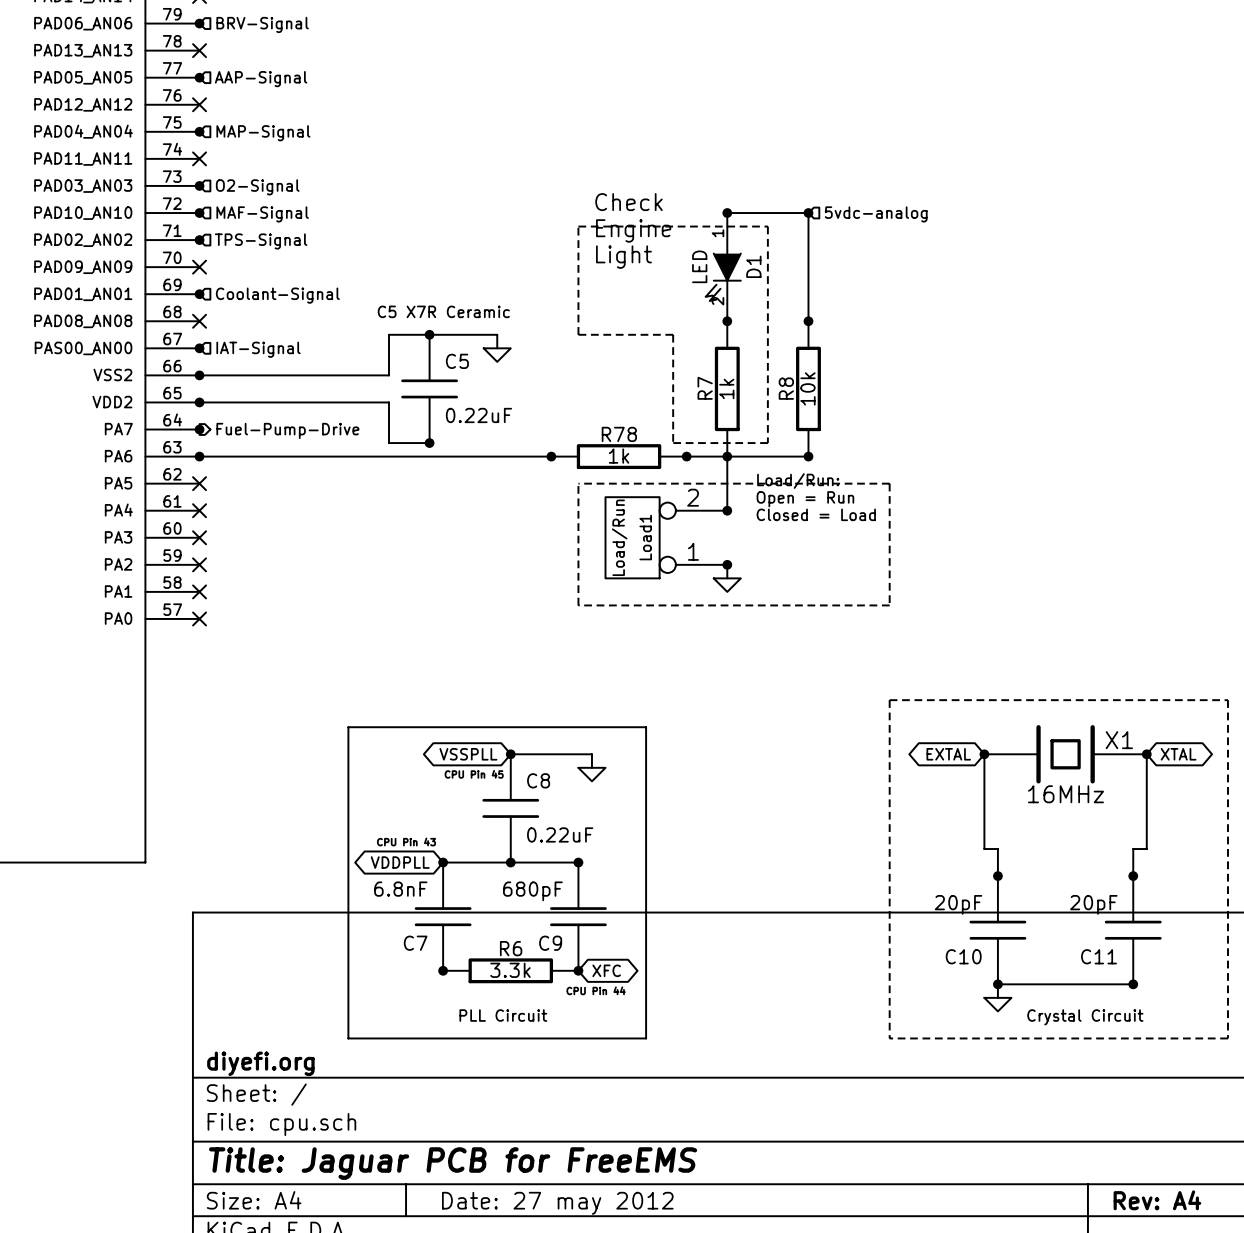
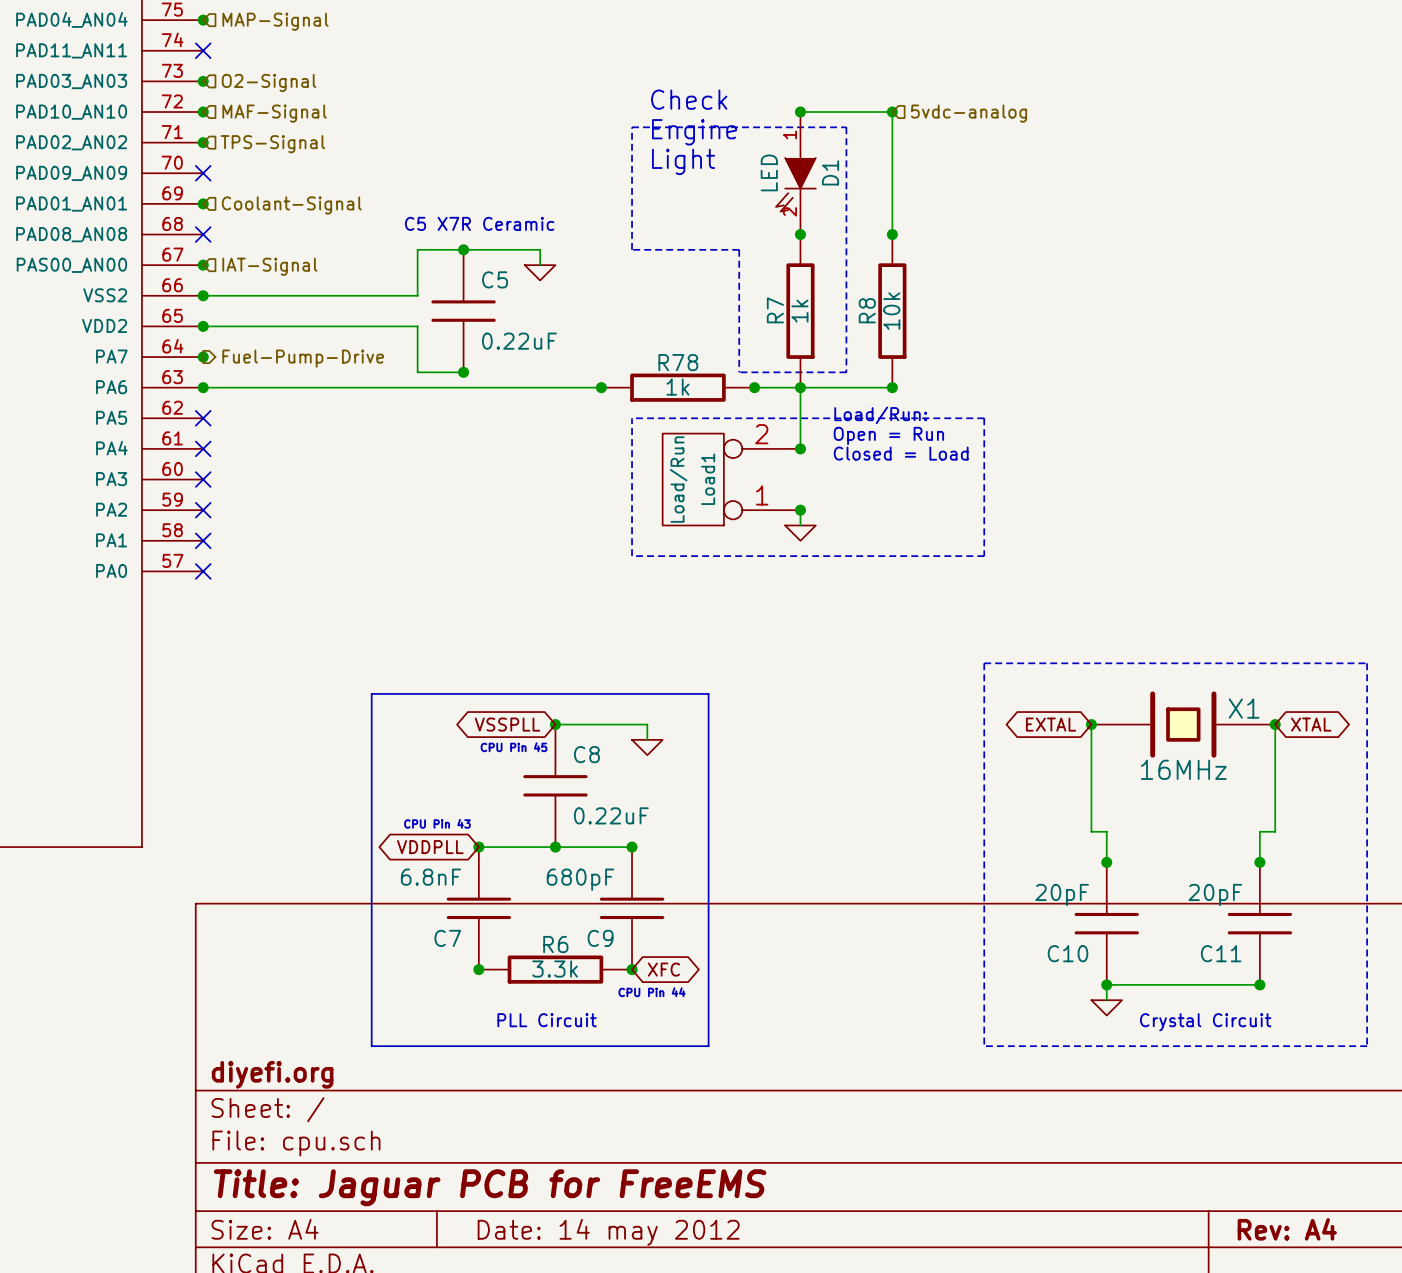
title block: Date: 27 may 2012 (557, 1203) -> Date: 14 may 2012 (608, 1232)

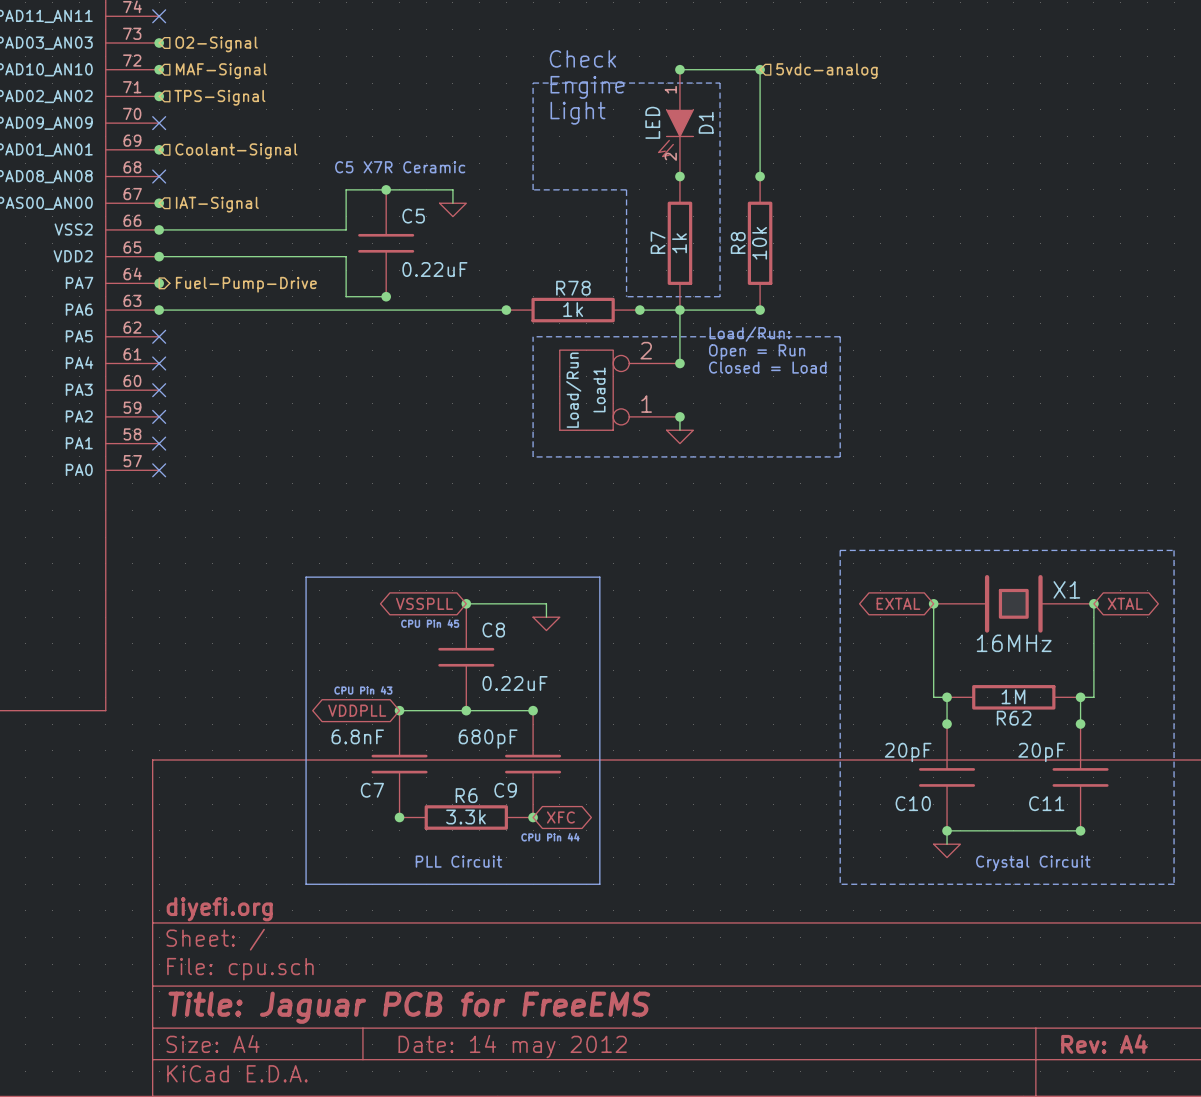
junction: none -> (947, 697)
R62: none -> 1M (1013, 697)
junction: none -> (1080, 697)

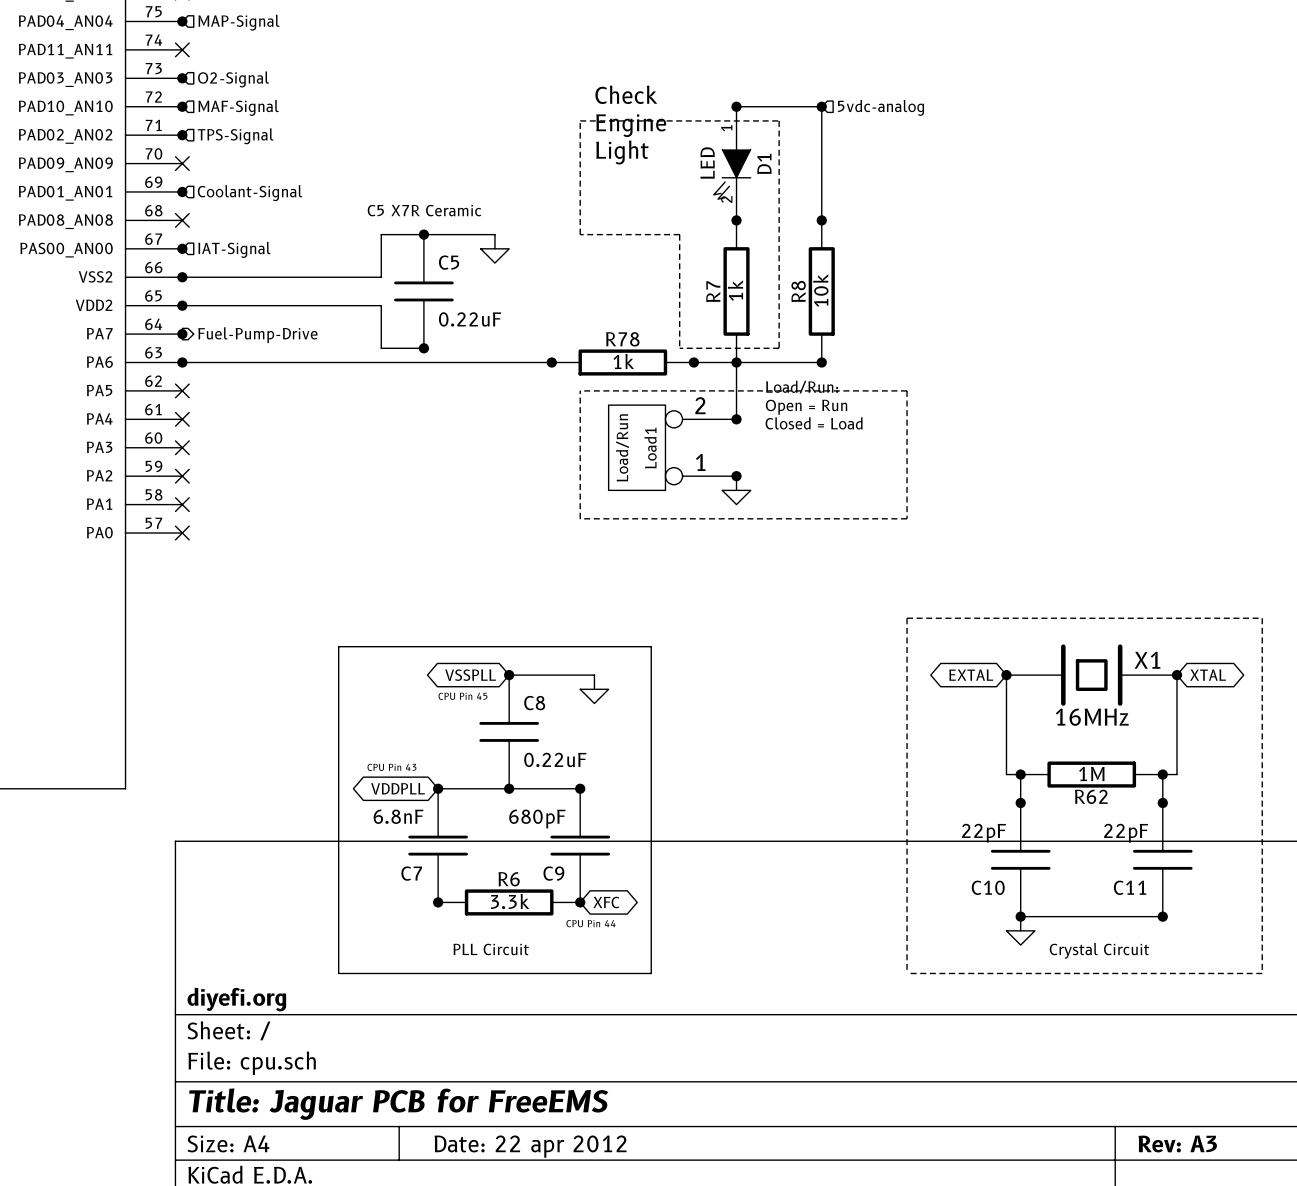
C10 value: 20pF (908, 752) -> 22pF (984, 833)
C11 value: 20pF (1041, 752) -> 22pF (1126, 833)
title block: Rev: A4 (1104, 1043) -> Rev: A3 (1177, 1143)
title block: Date: 14 may 2012 (512, 1046) -> Date: 22 apr 2012 (530, 1146)

